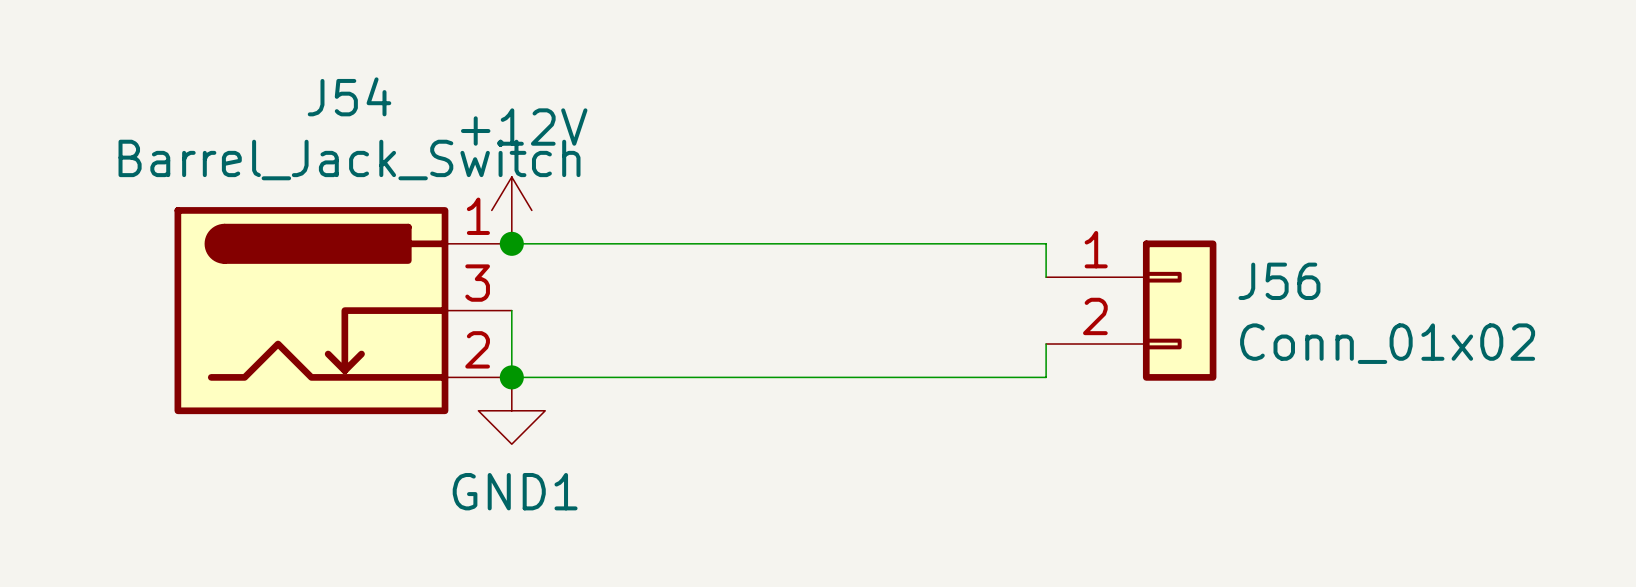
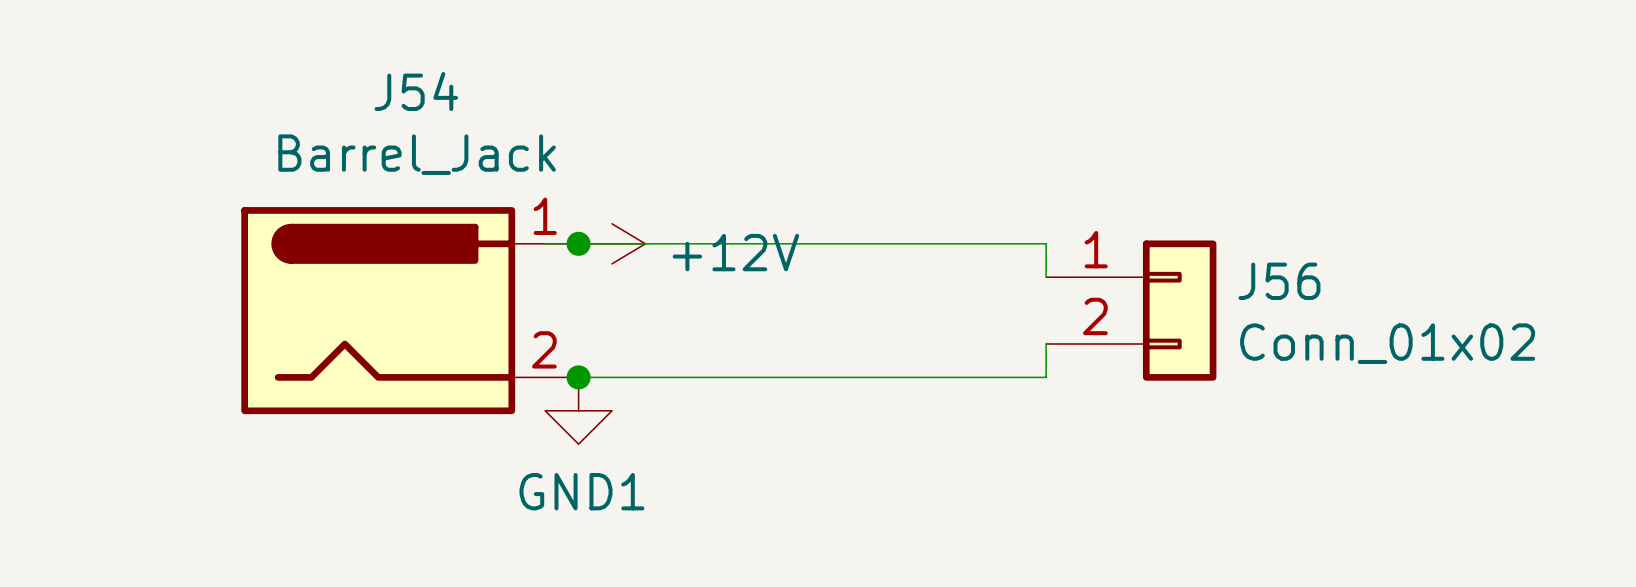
J54 value: Barrel_Jack_Switch (349, 160) -> Barrel_Jack (417, 154)
J54 symbol: [174, 207, 512, 415] -> [241, 207, 579, 415]
power symbol rotation: 0° (511, 210) -> 90° clockwise (611, 243)
power symbol position: +12V (511, 210) -> +12V (611, 243)
junction position: (511, 243) -> (578, 243)
junction position: (511, 377) -> (578, 377)
power symbol position: GND1 (511, 410) -> GND1 (578, 410)

